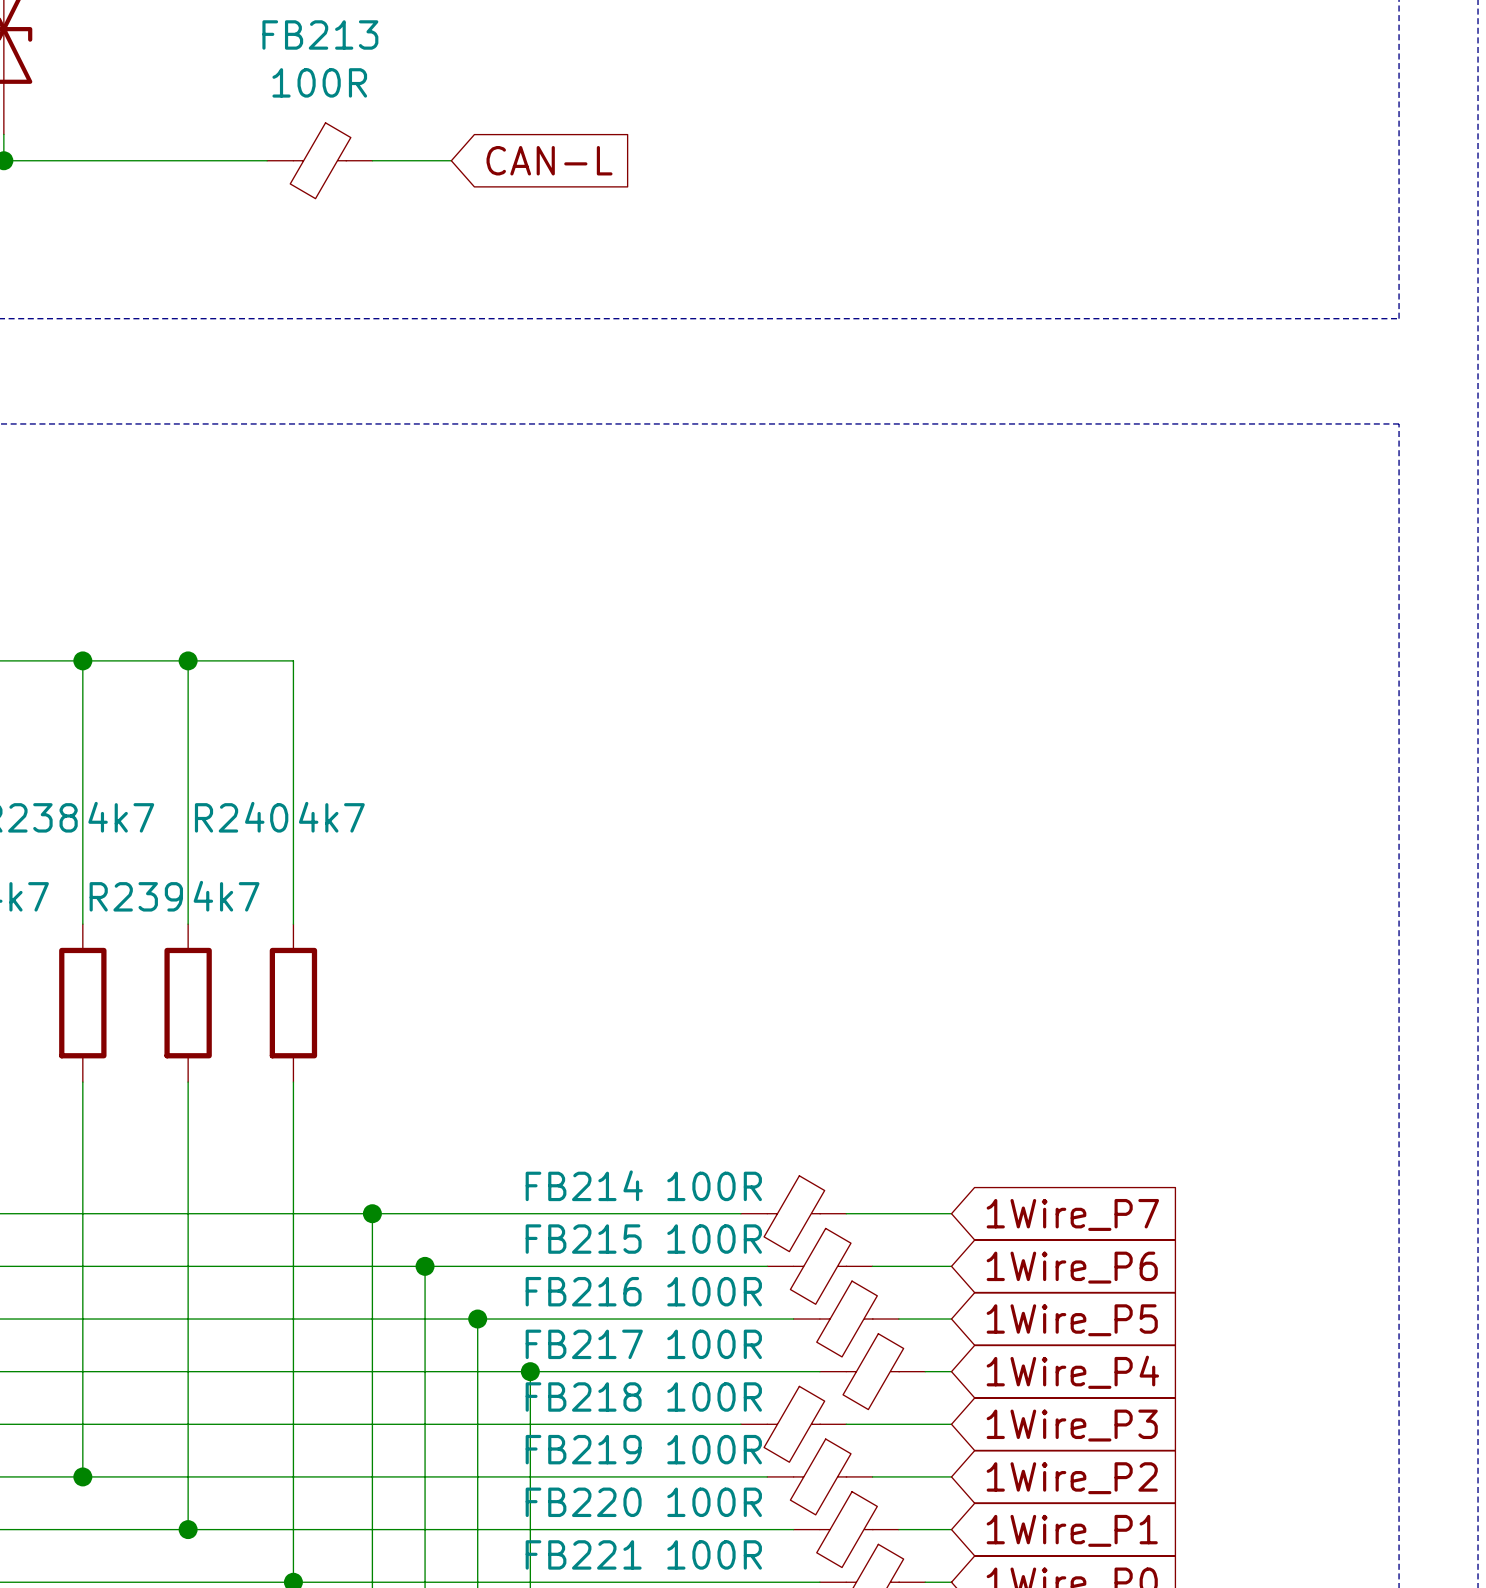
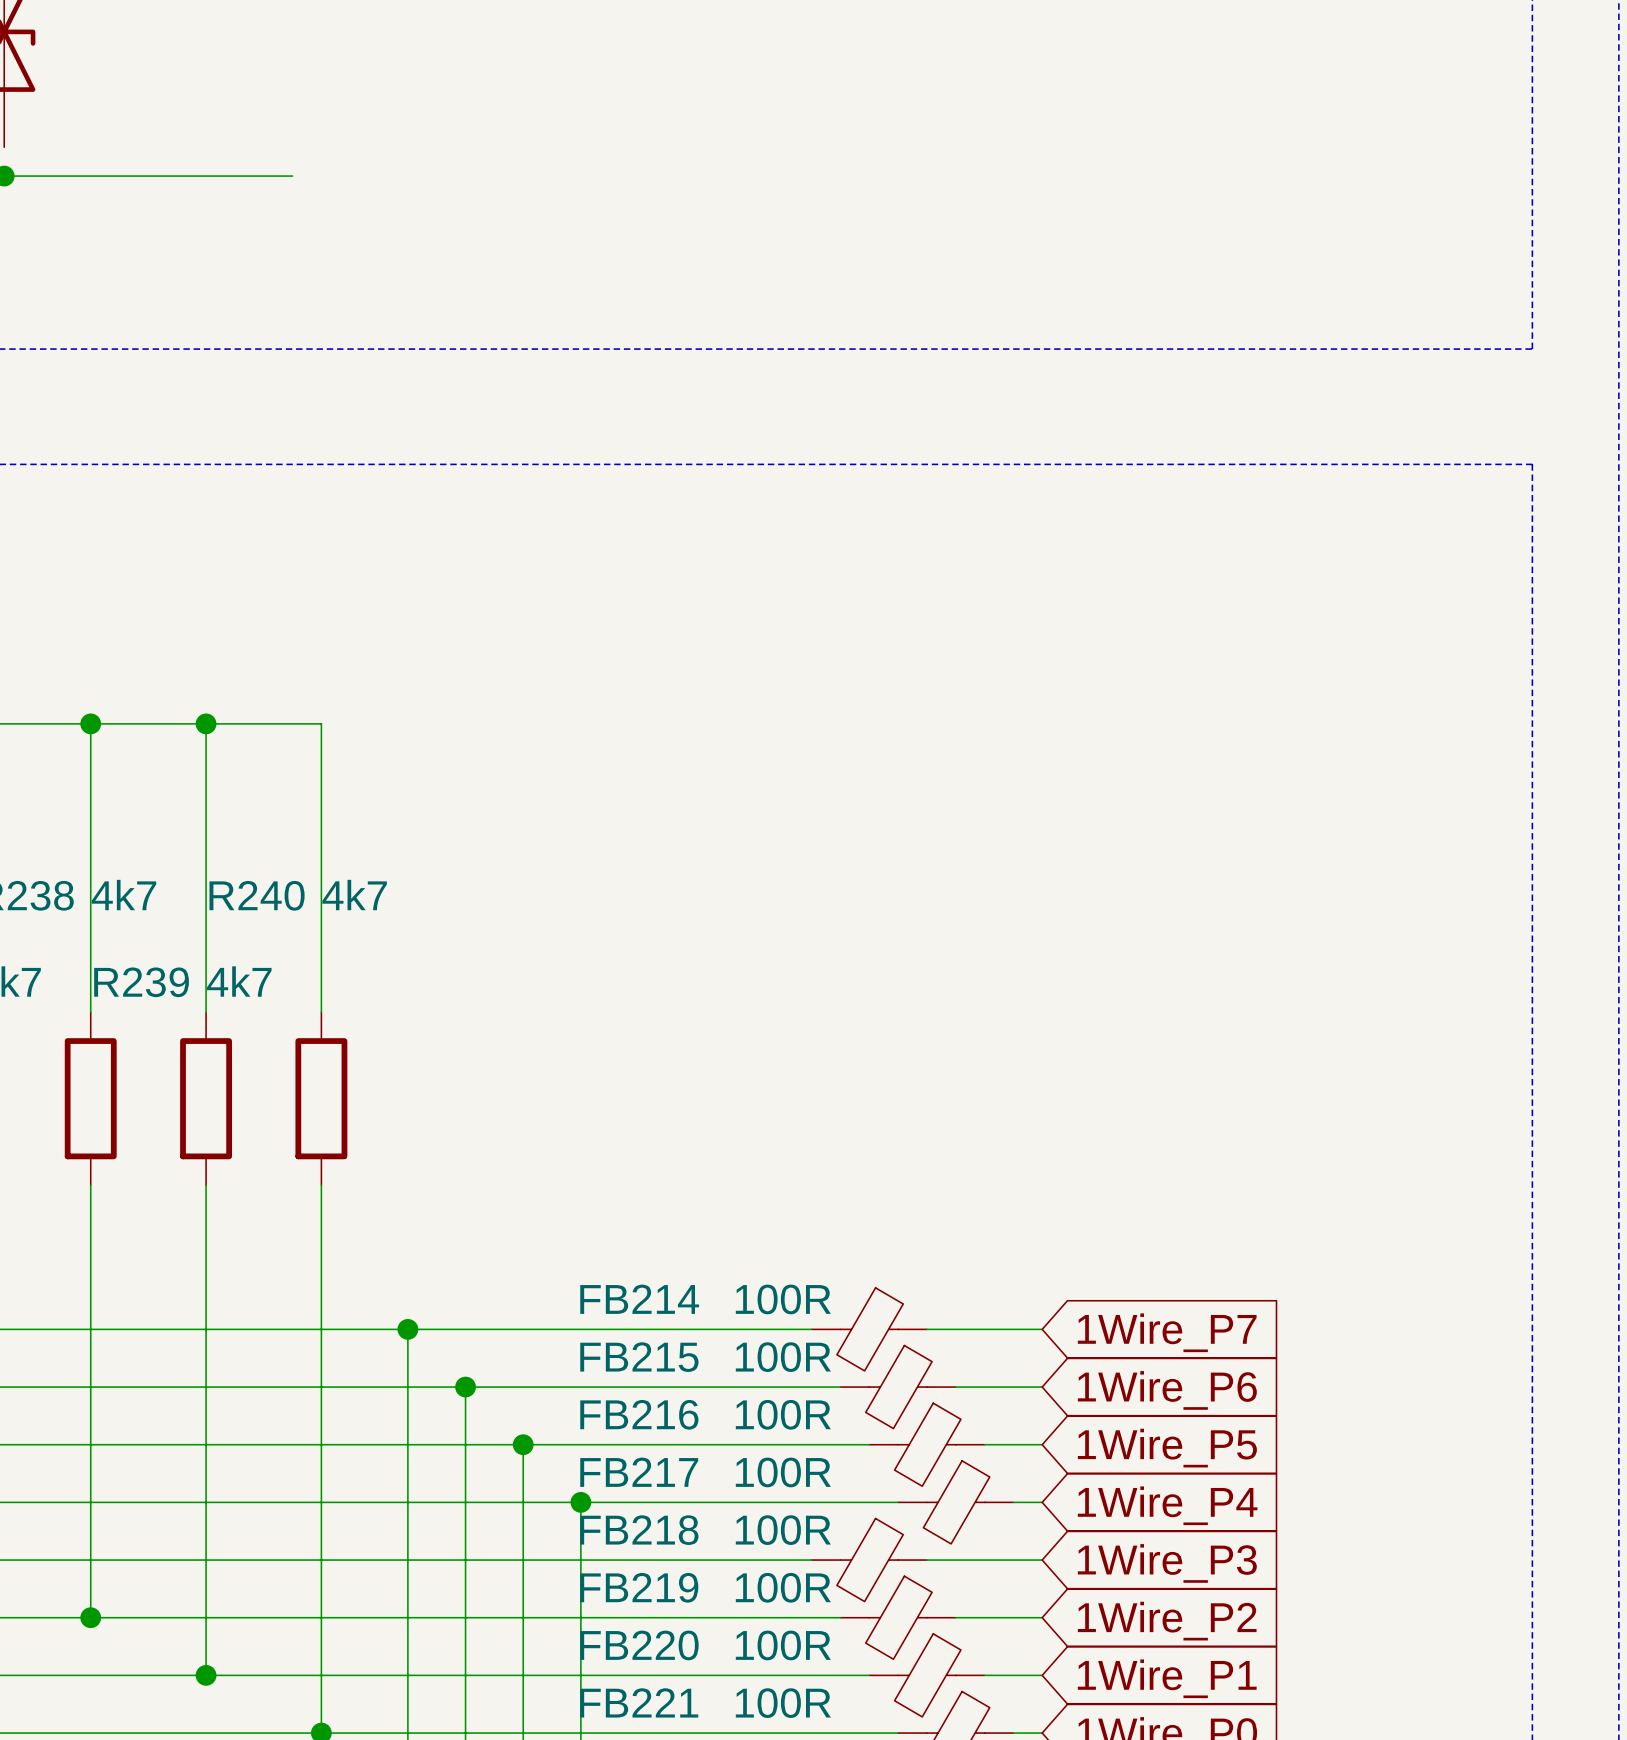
wire: (3, 134) (3, 160) -> none
FB213: 100R (319, 160) -> none
wire: (372, 160) (451, 160) -> none
global label: CAN-L (549, 160) -> none

